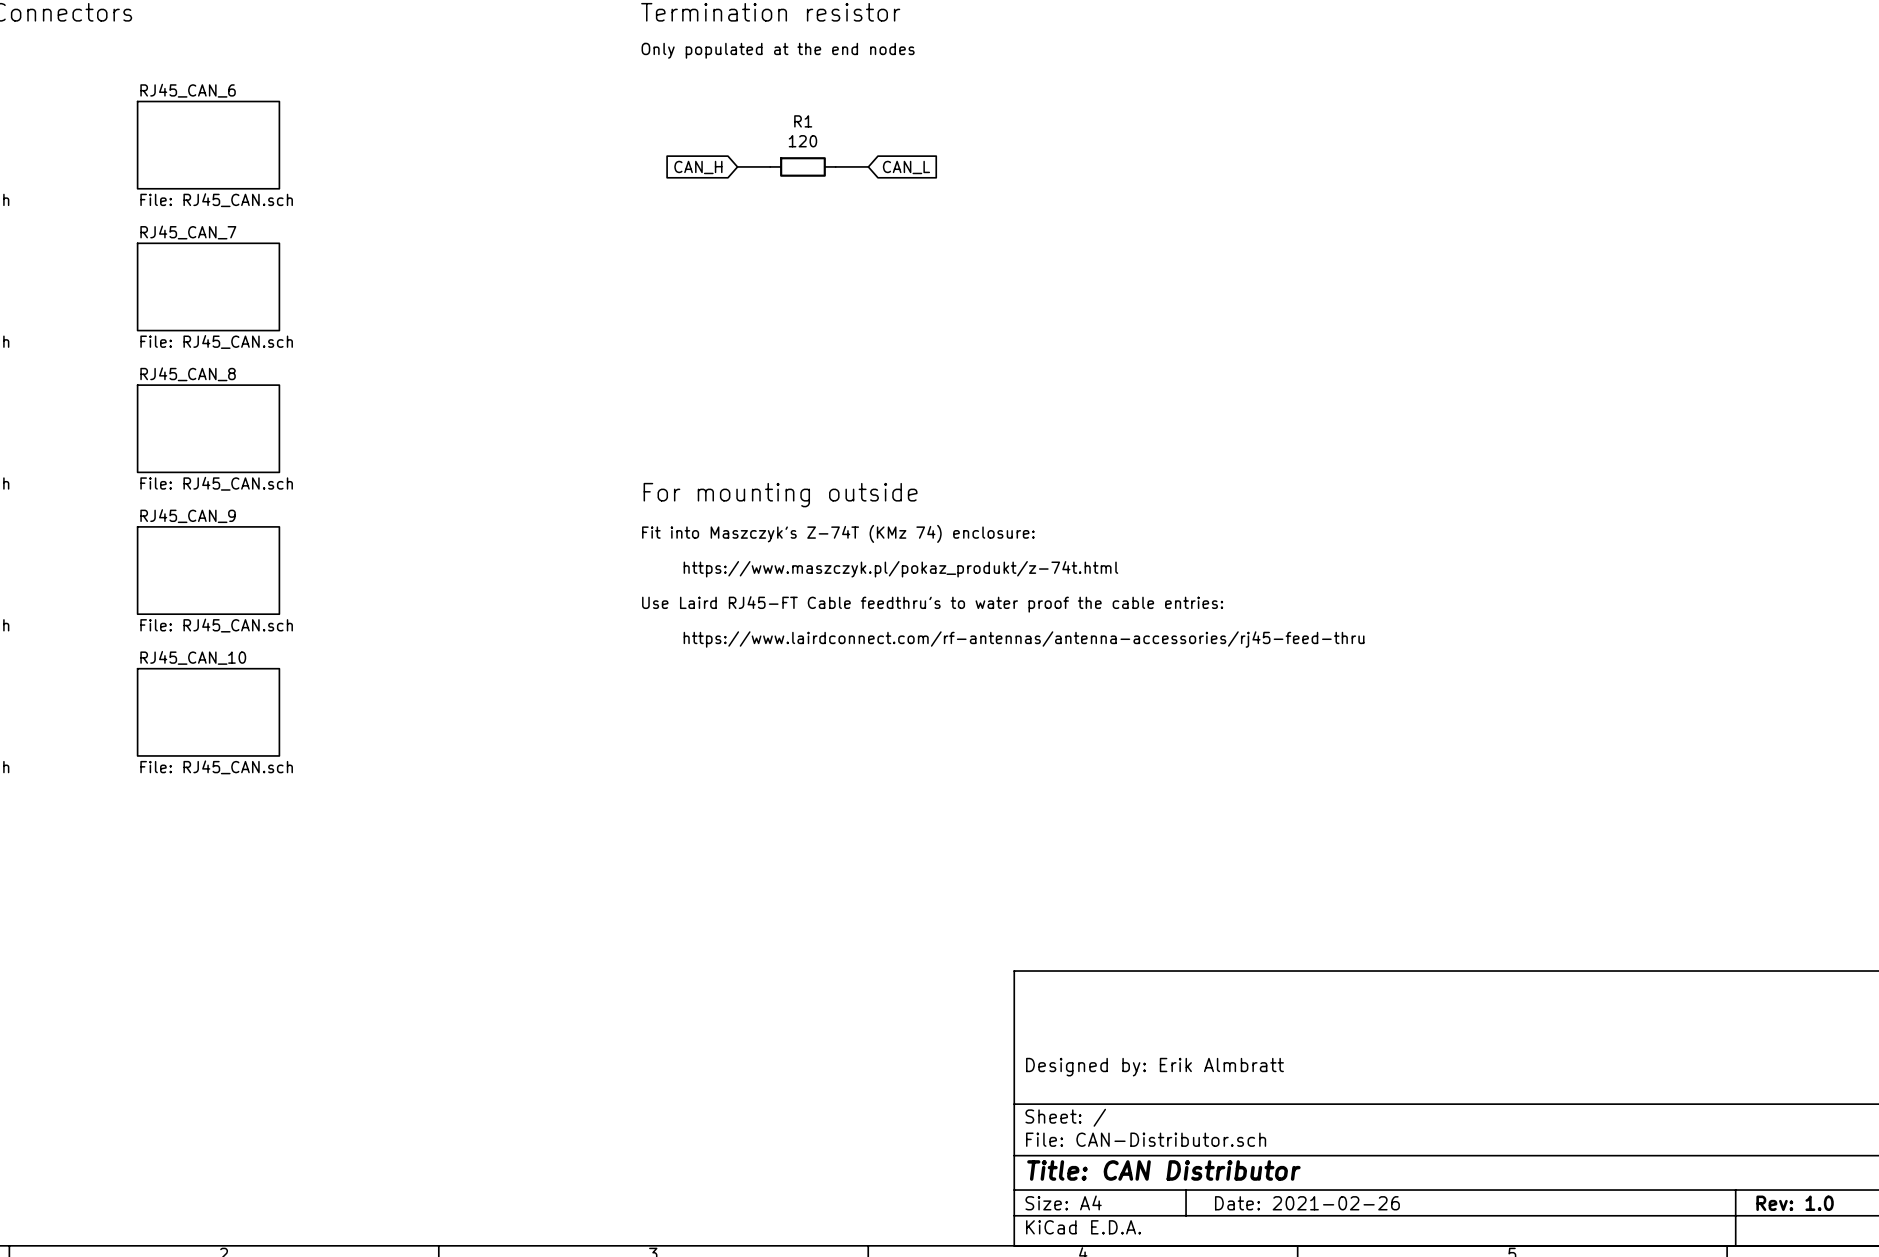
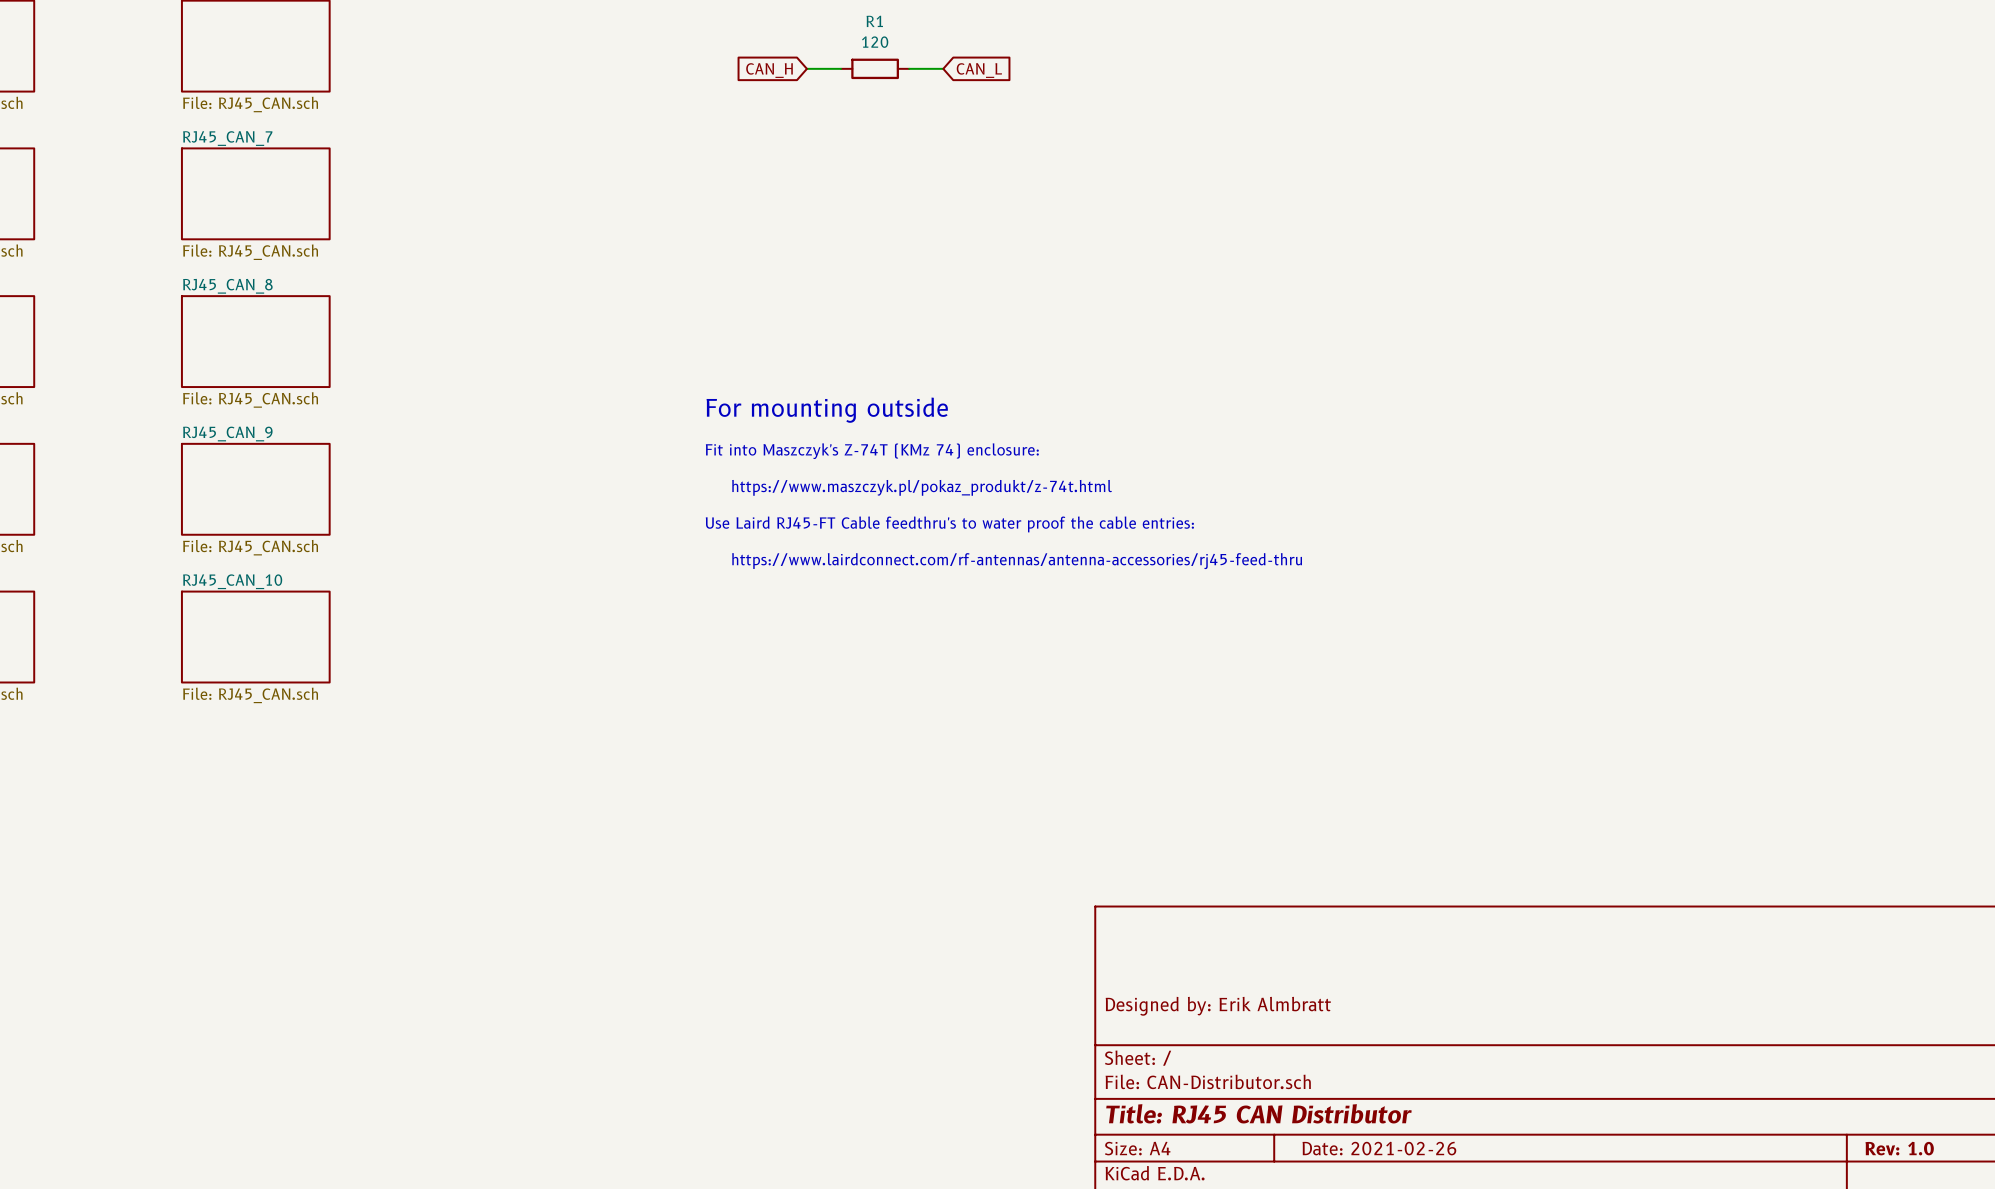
title block: Title: CAN Distributor (1163, 1170) -> Title: RJ45 CAN Distributor (1258, 1113)

